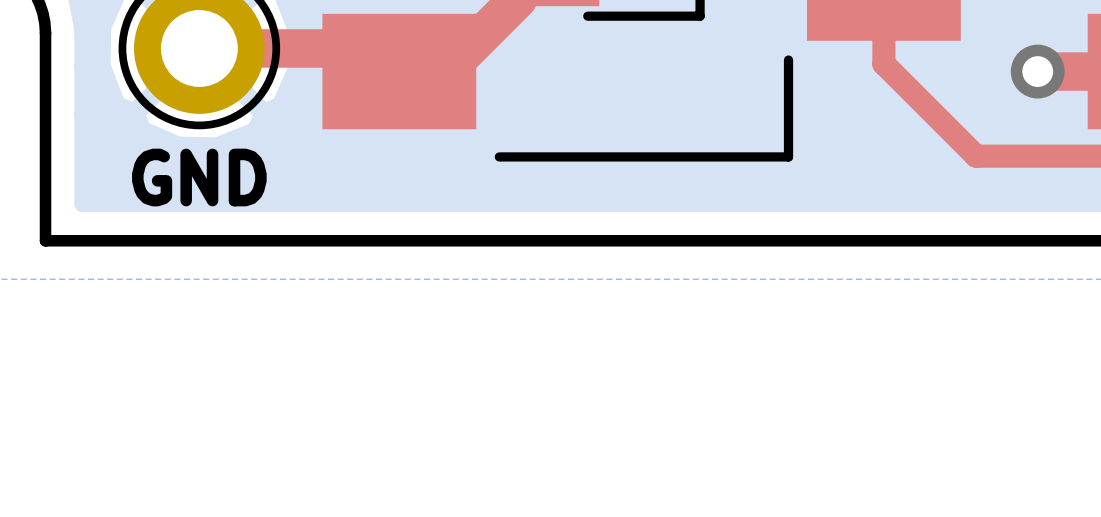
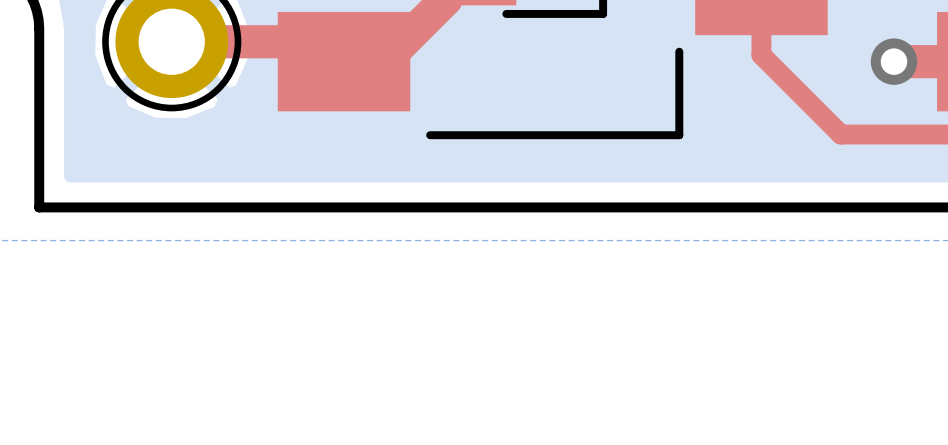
part value: GND (199, 177) -> none

